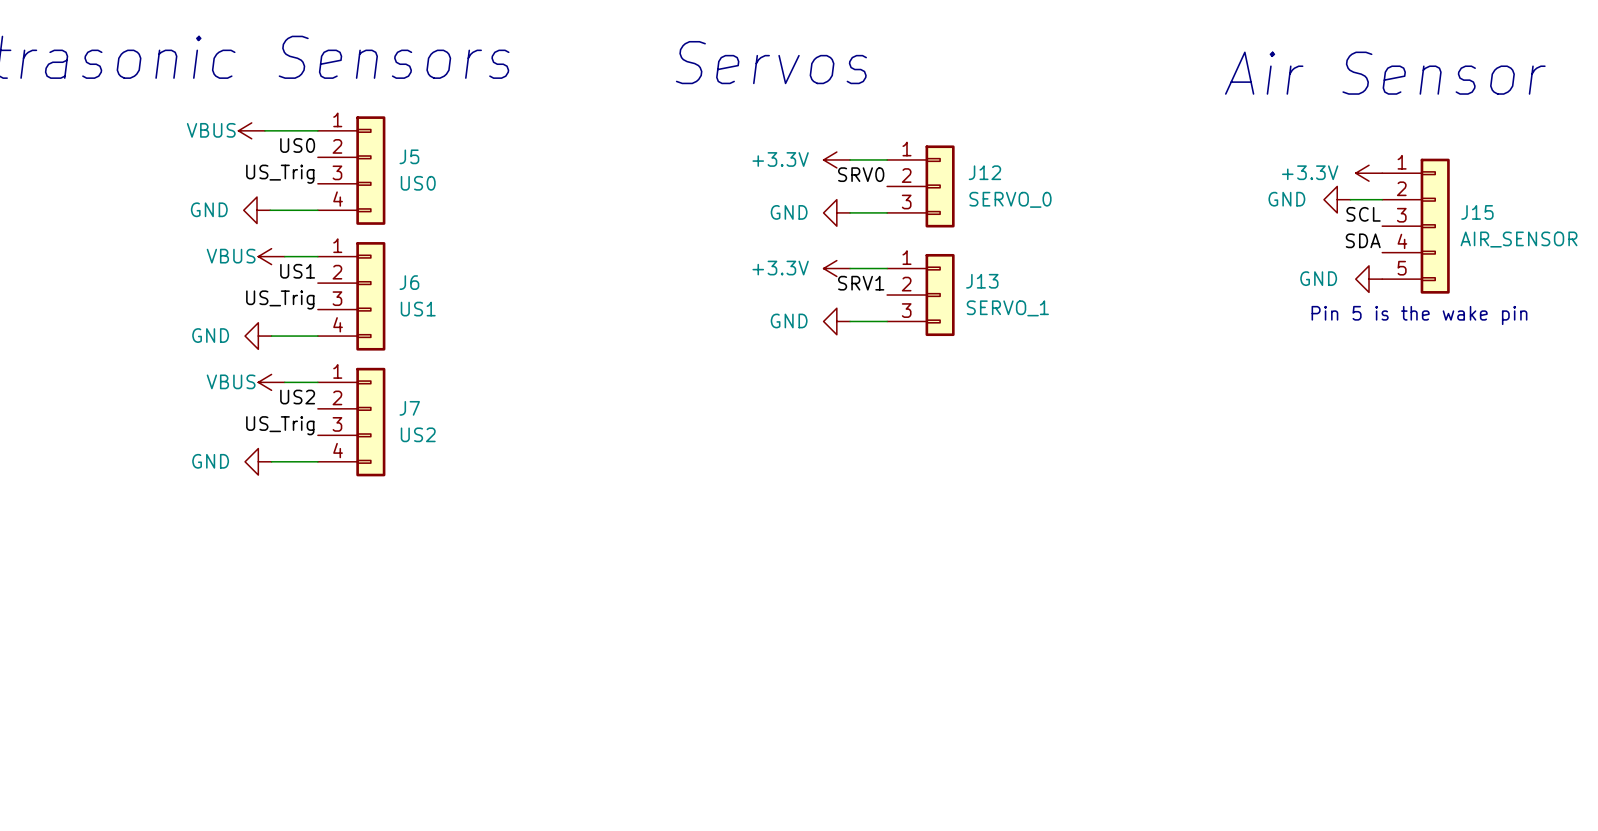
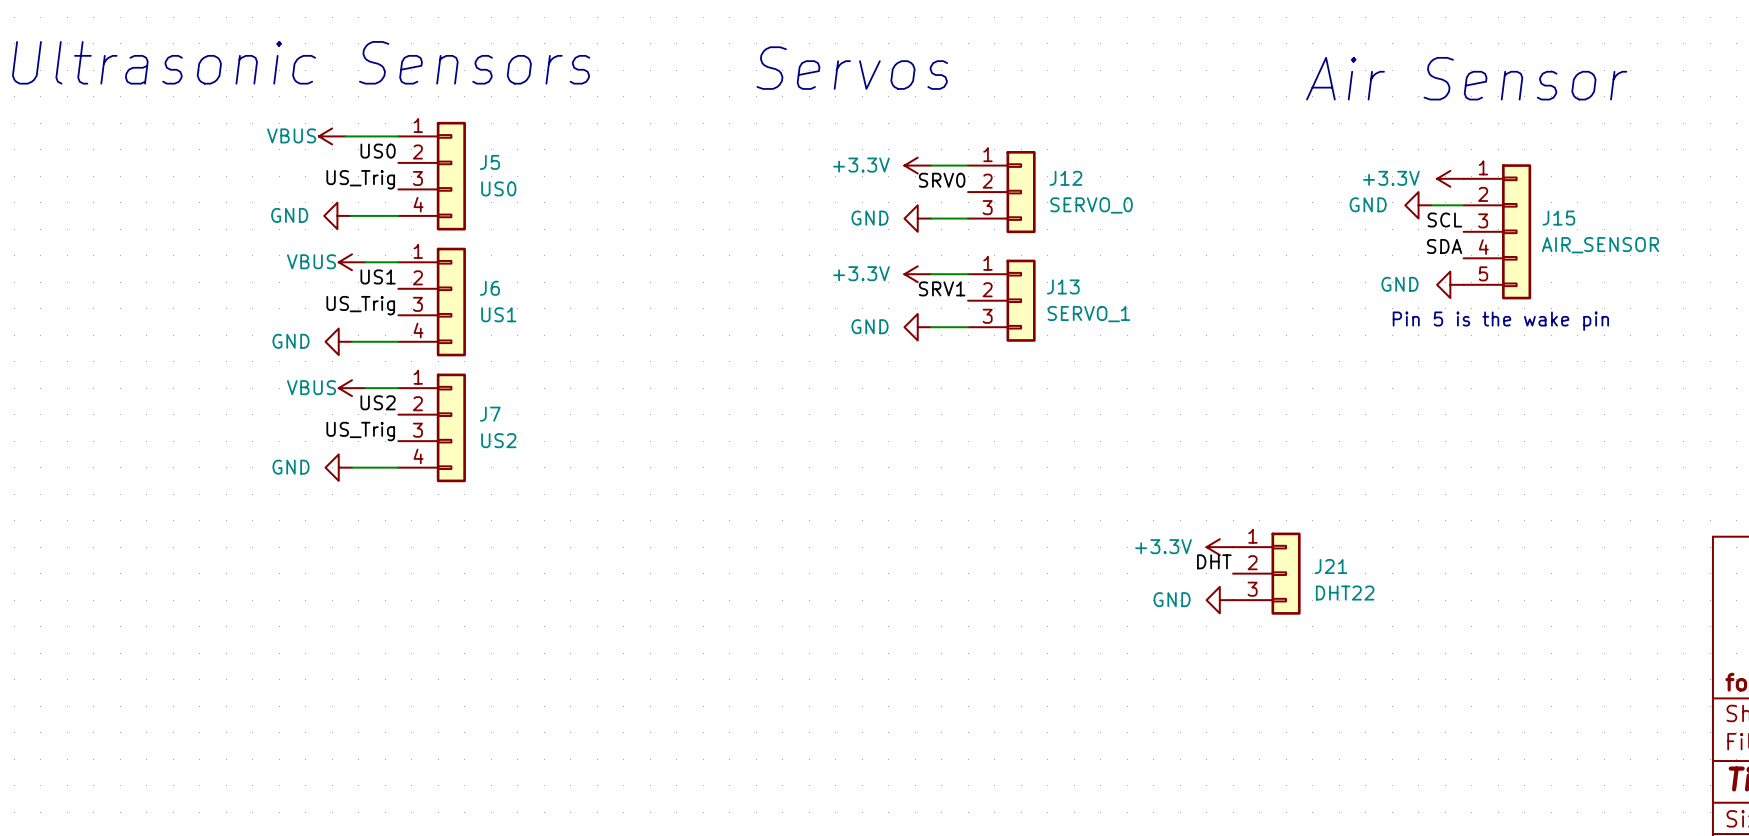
power symbol: none -> +3.3V (1219, 547)
label: none -> DHT (1214, 561)
J21: none -> DHT22 (1266, 573)
power symbol: none -> GND (1219, 600)

